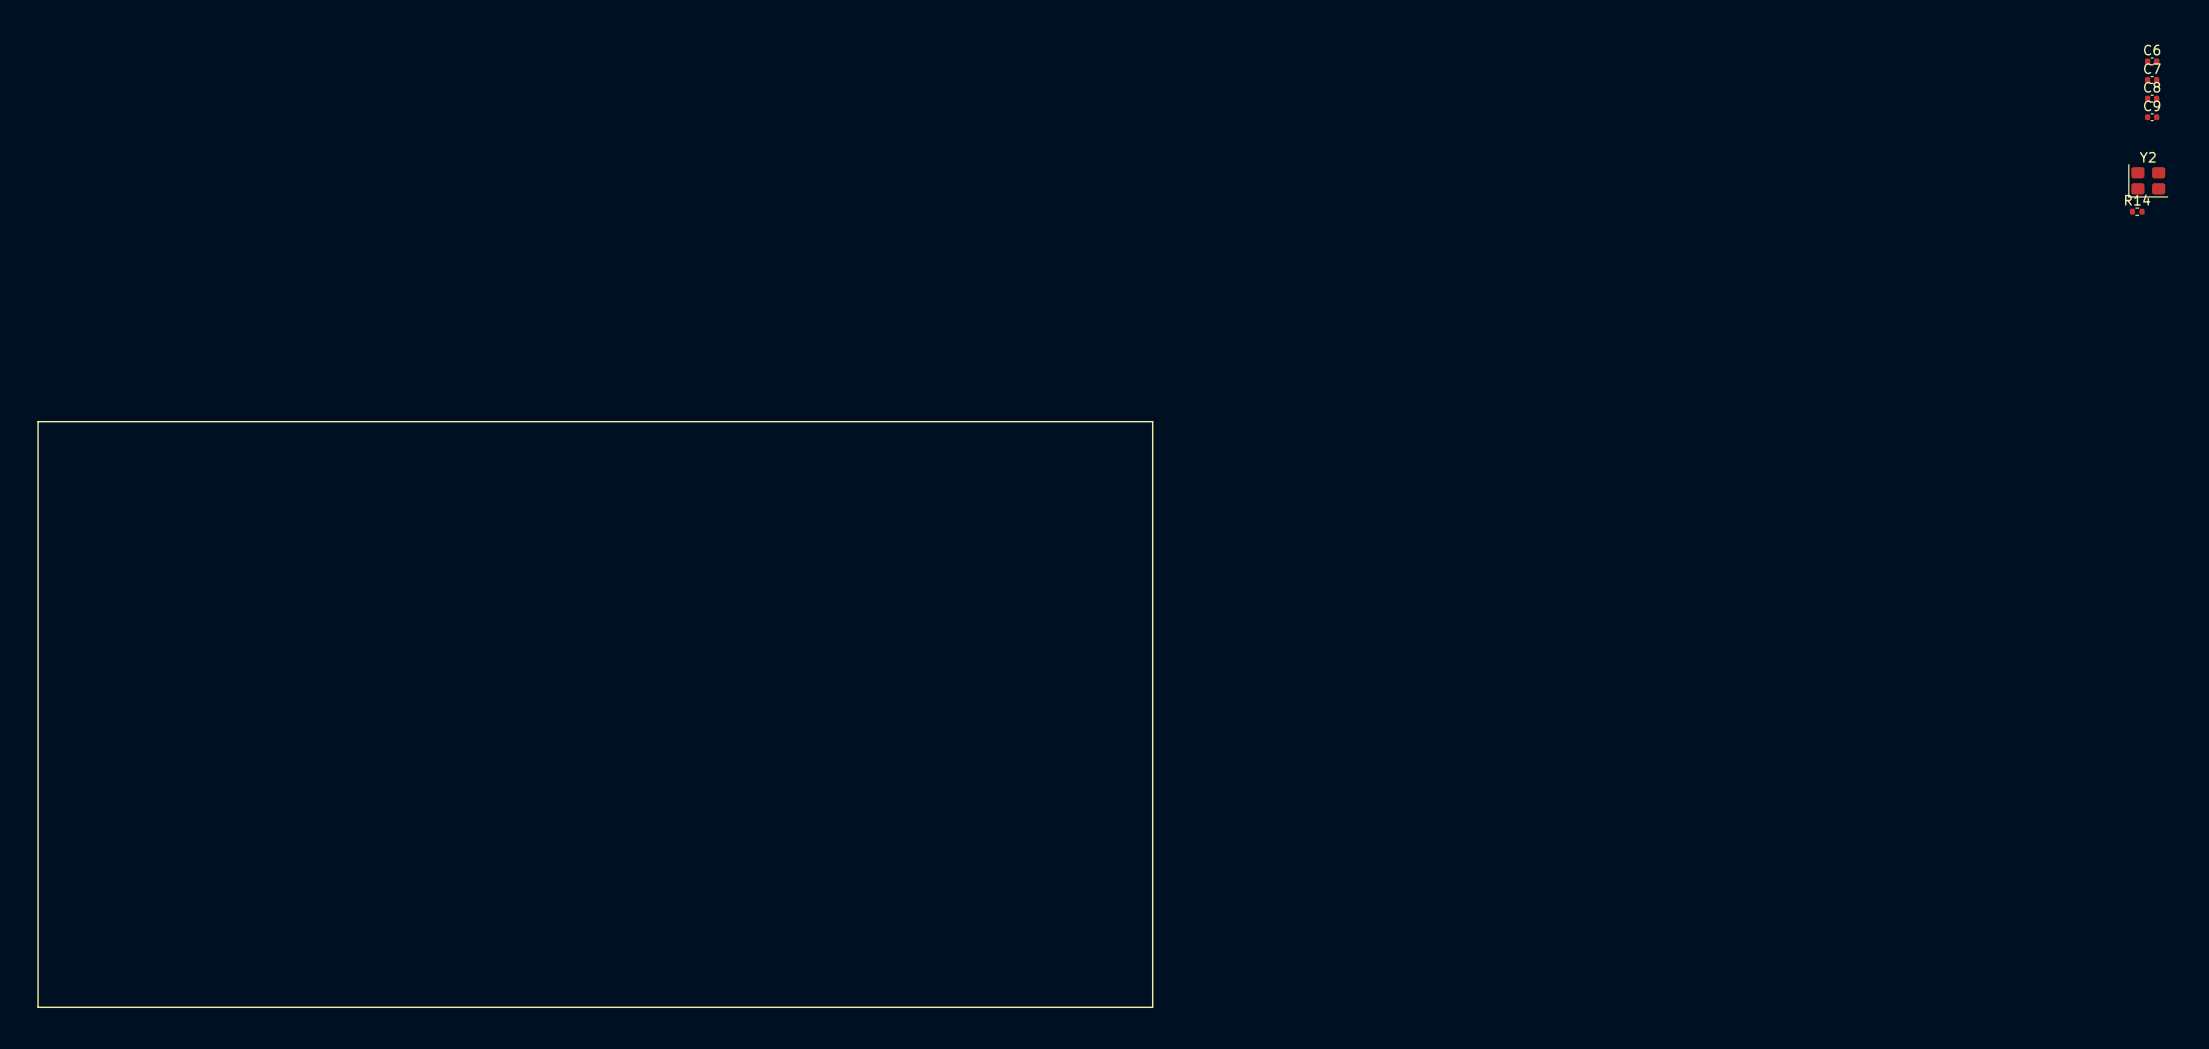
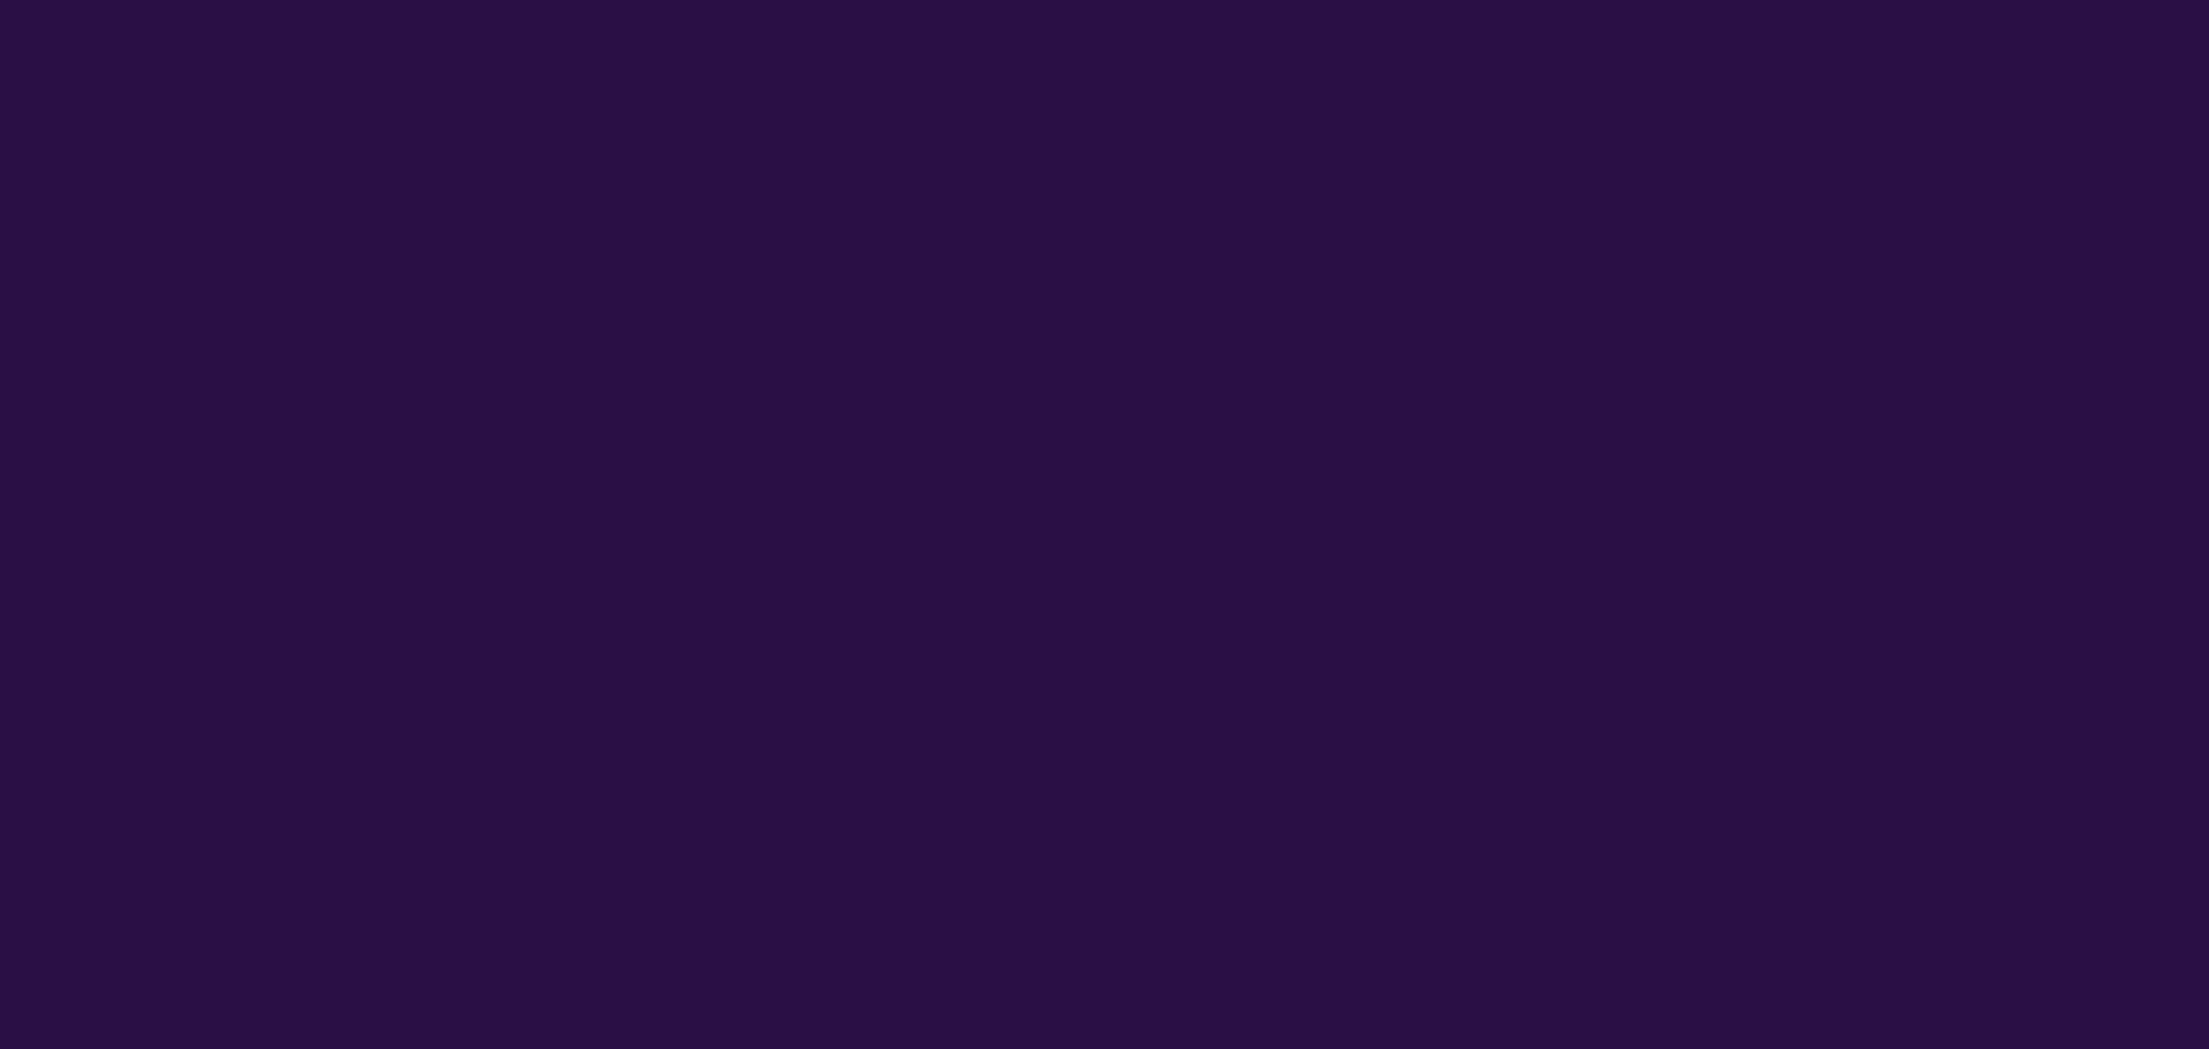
C6: (2152, 61) -> none
C7: (2152, 80) -> none
C8: (2152, 98) -> none
C9: (2152, 117) -> none
Y2: (2148, 180) -> none
R14: (2137, 211) -> none
line: (38, 421) (1152, 421) (1152, 1007) (38, 1007) (38, 421) -> none

